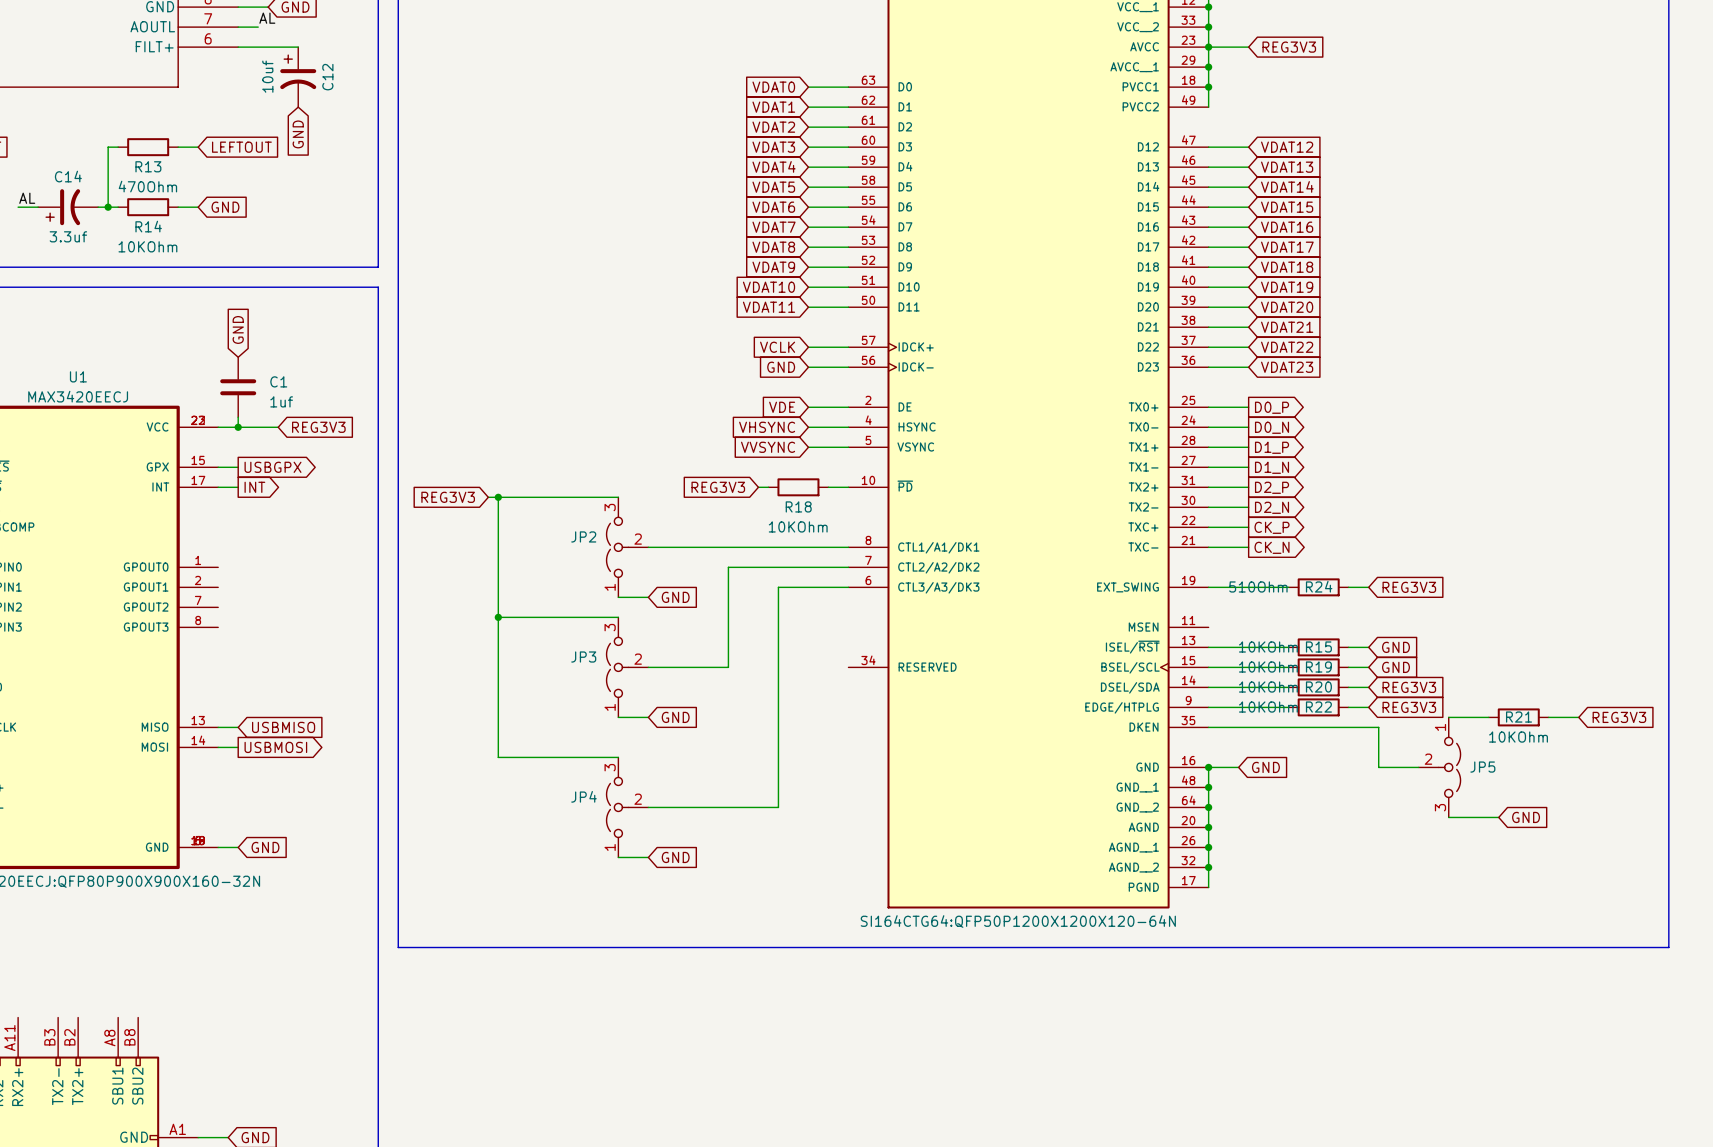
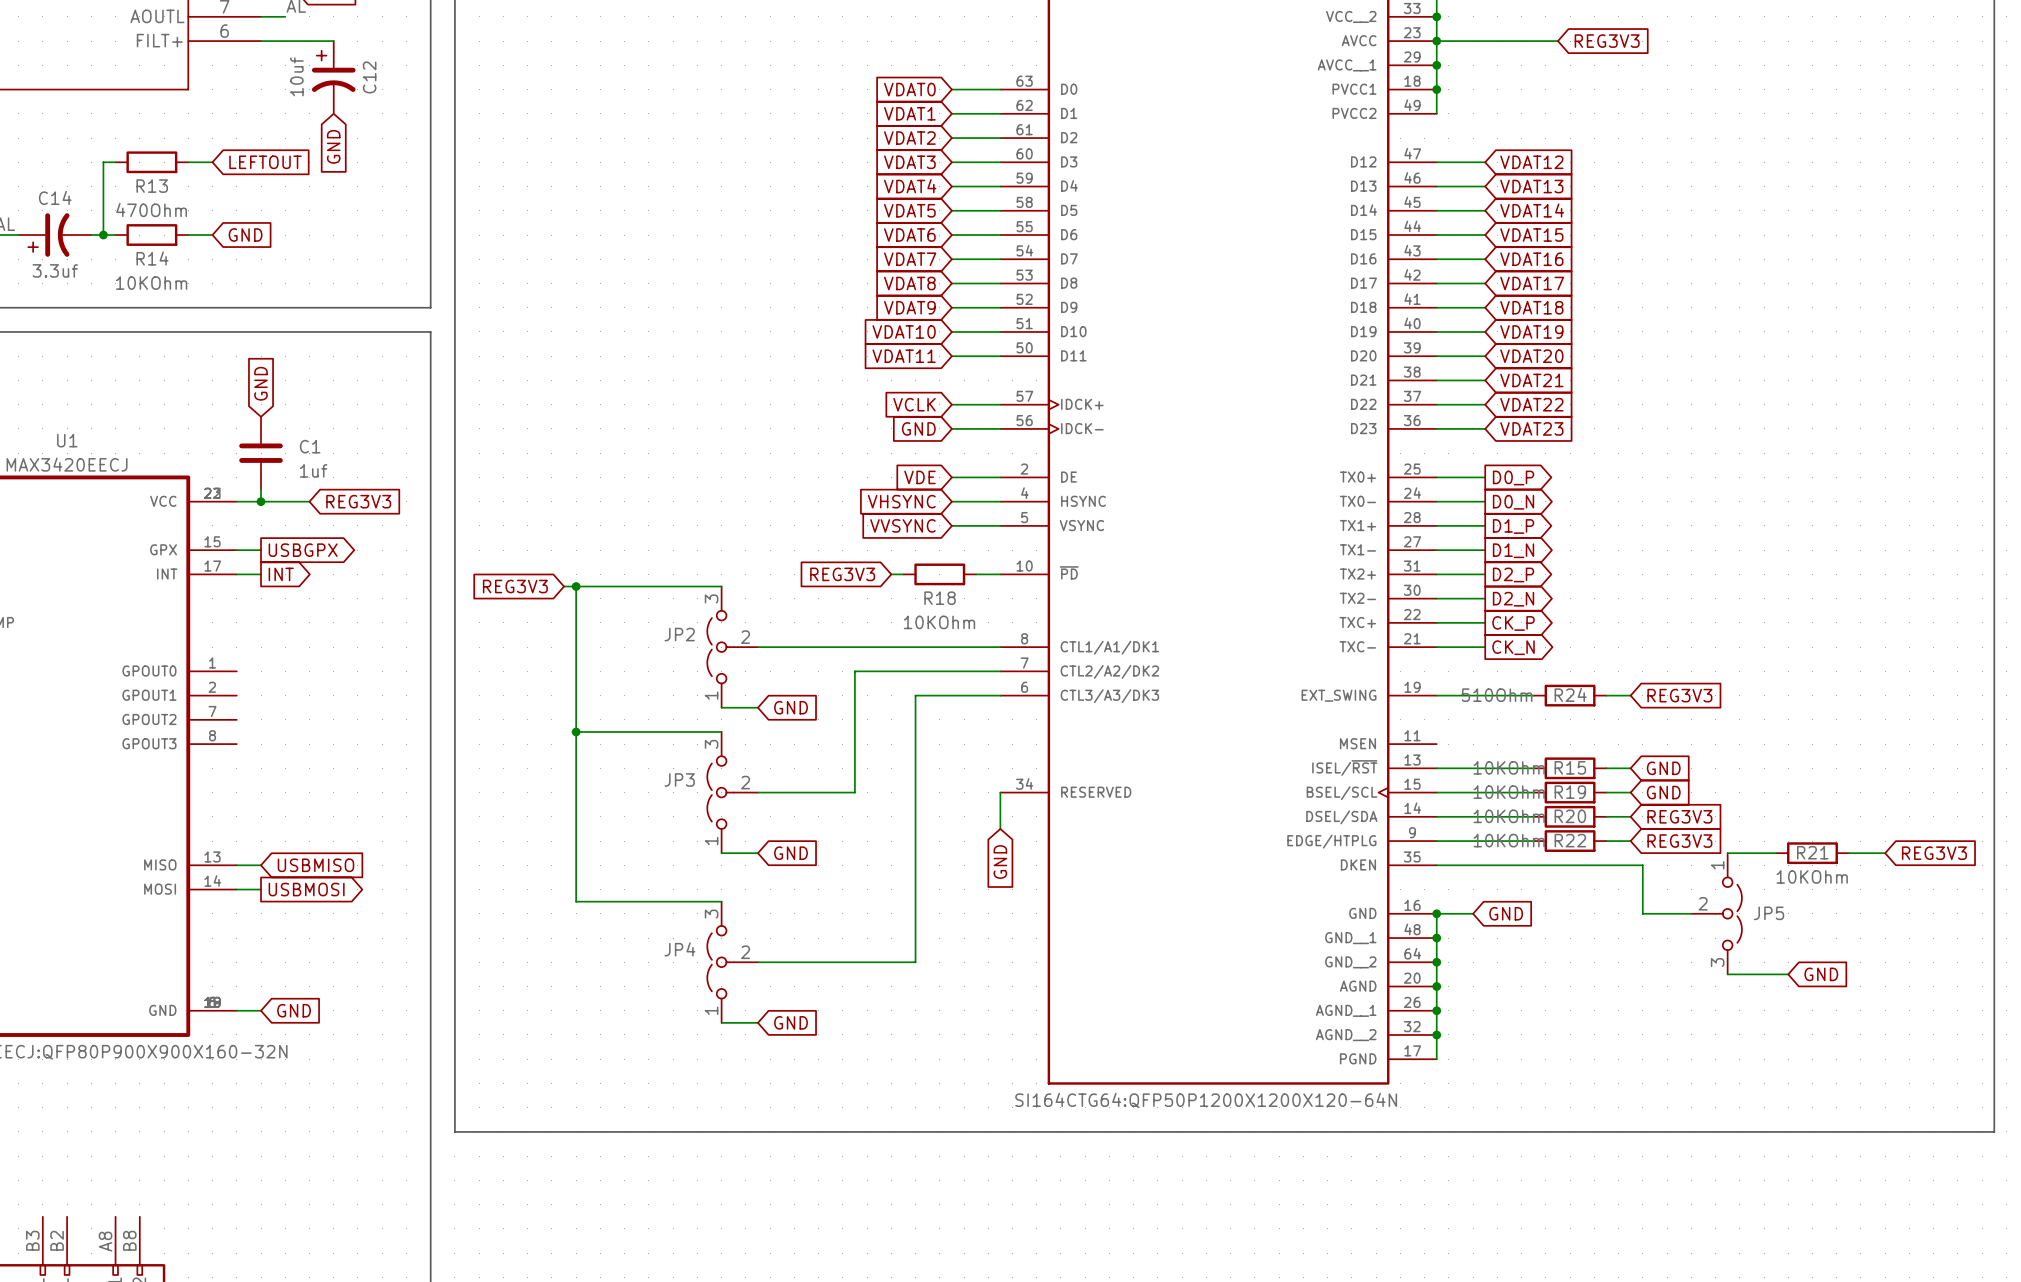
wire: none -> (1485, 41) (1557, 41)
global label position: REG3V3 (1289, 47) -> REG3V3 (1607, 41)
wire: none -> (1000, 792) (1000, 828)
global label: none -> GND (1000, 862)

